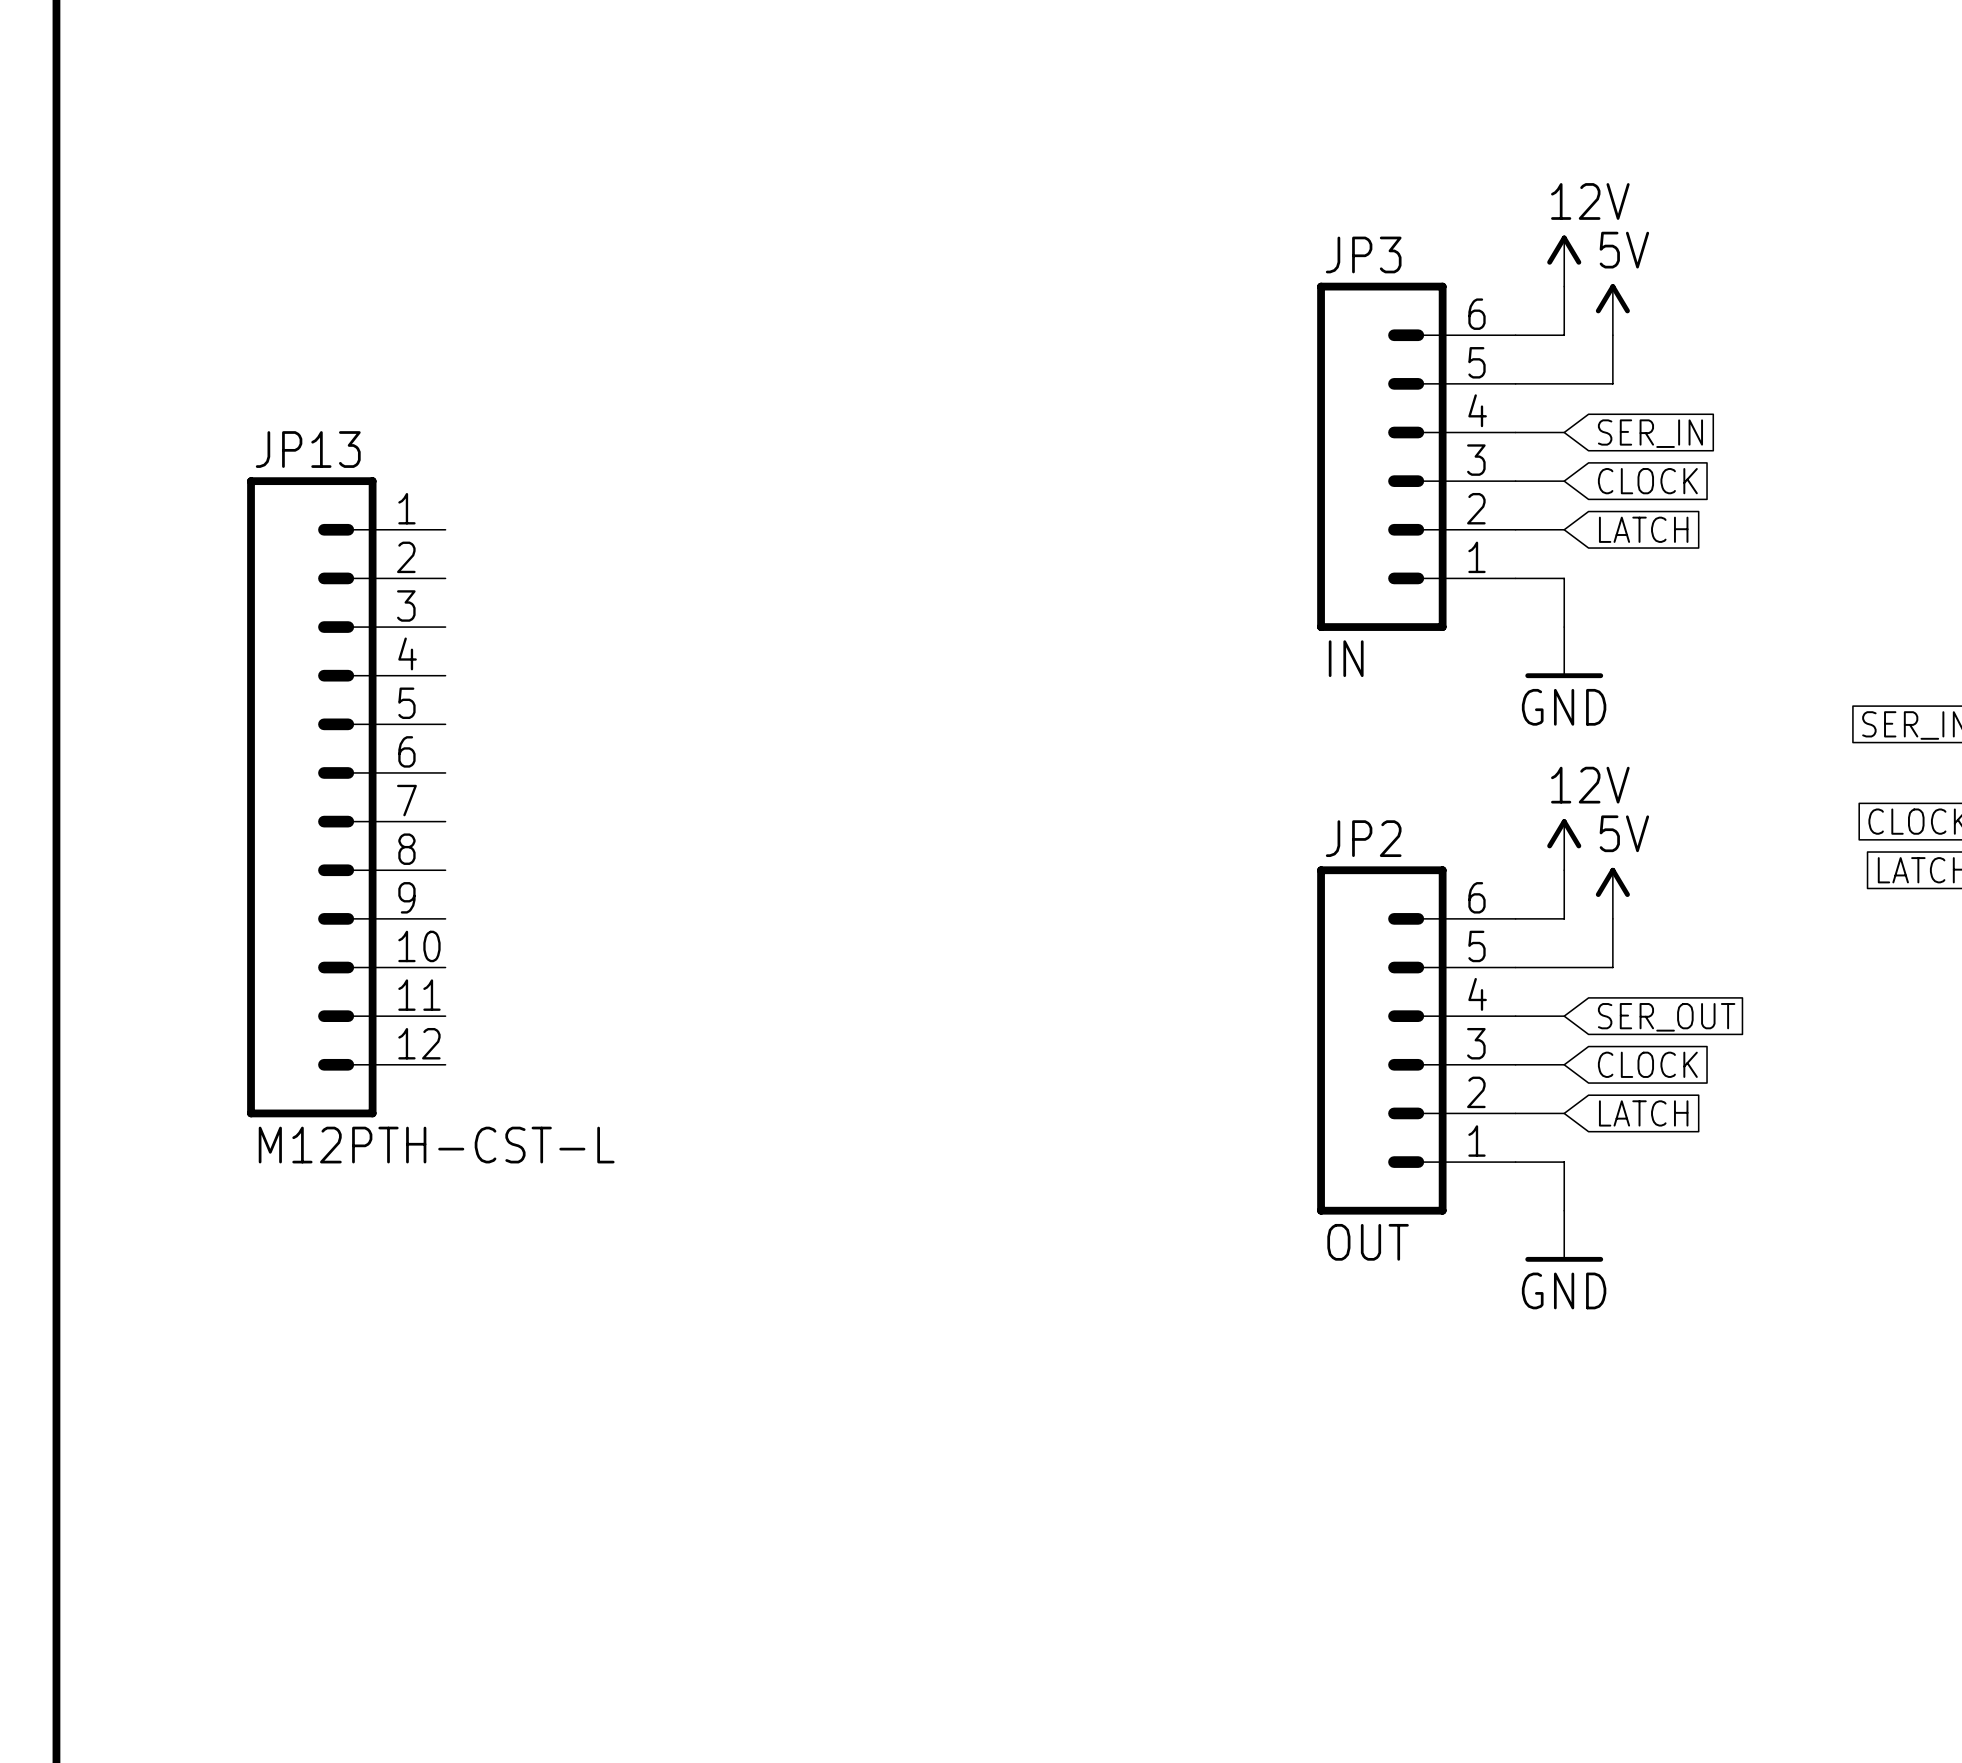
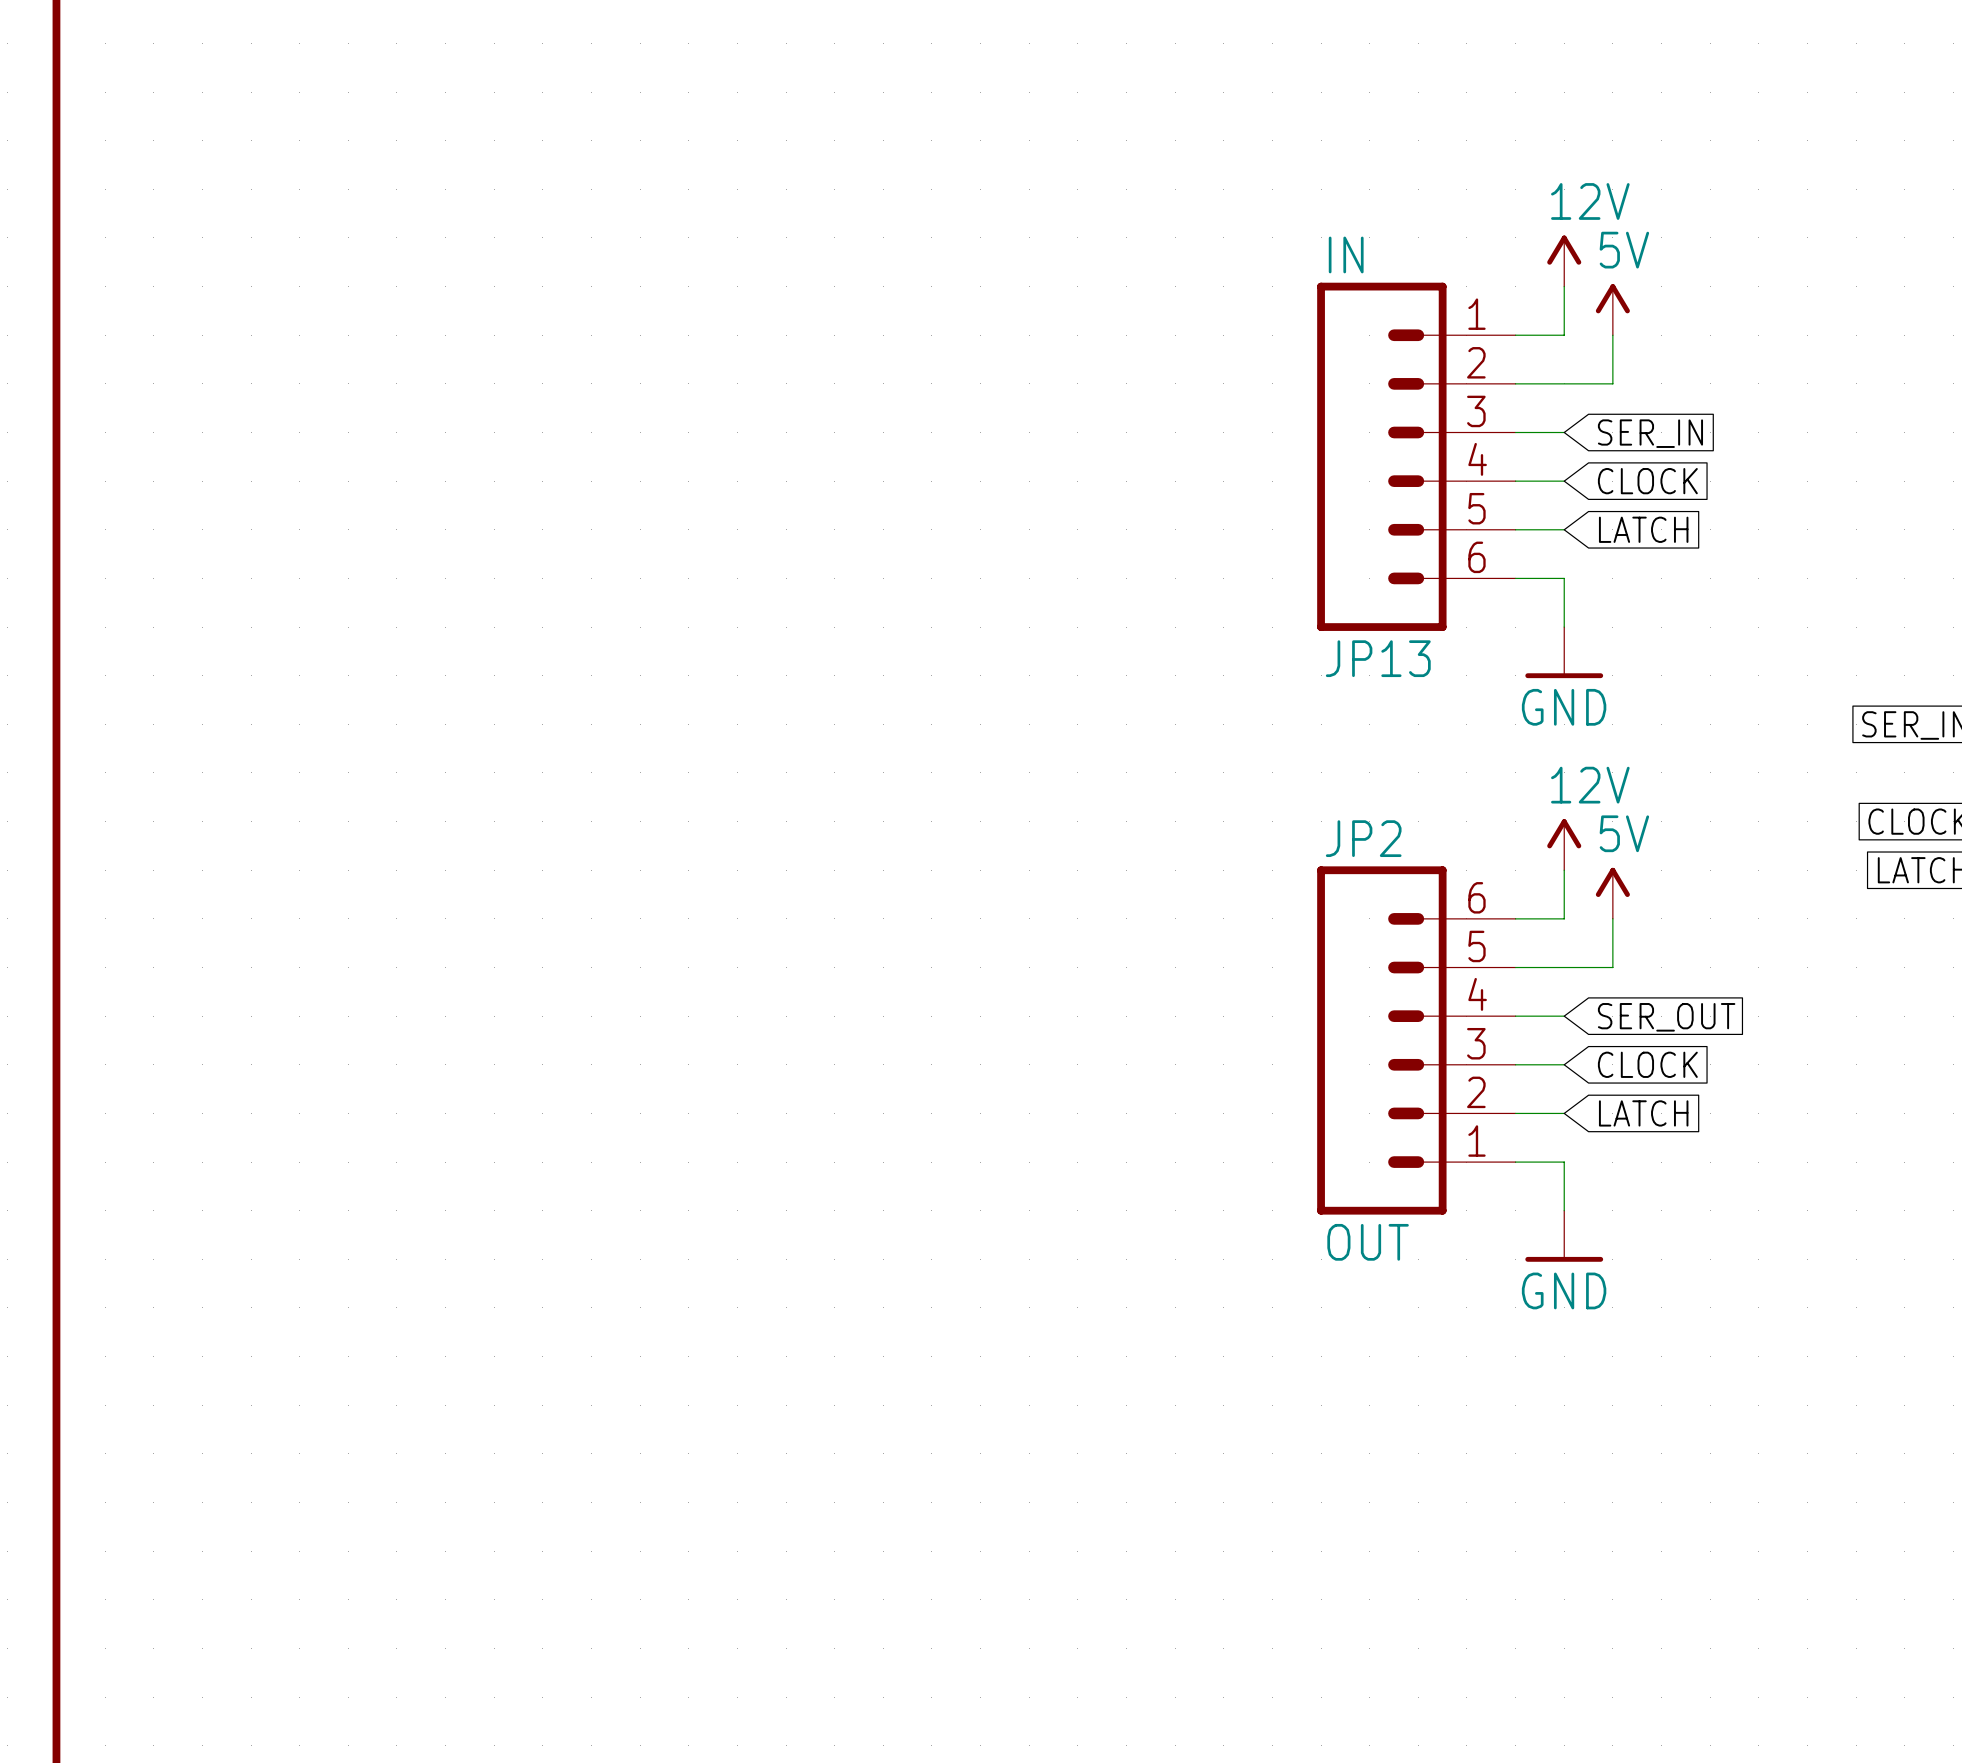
JP13 name position: JP13 (308, 449) -> JP13 (1378, 658)
JP3: IN (1416, 456) -> none
JP13 symbol: [247, 477, 446, 1118] -> [1317, 282, 1516, 631]
JP13 value: M12PTH-CST-L (436, 1145) -> IN (1346, 254)

